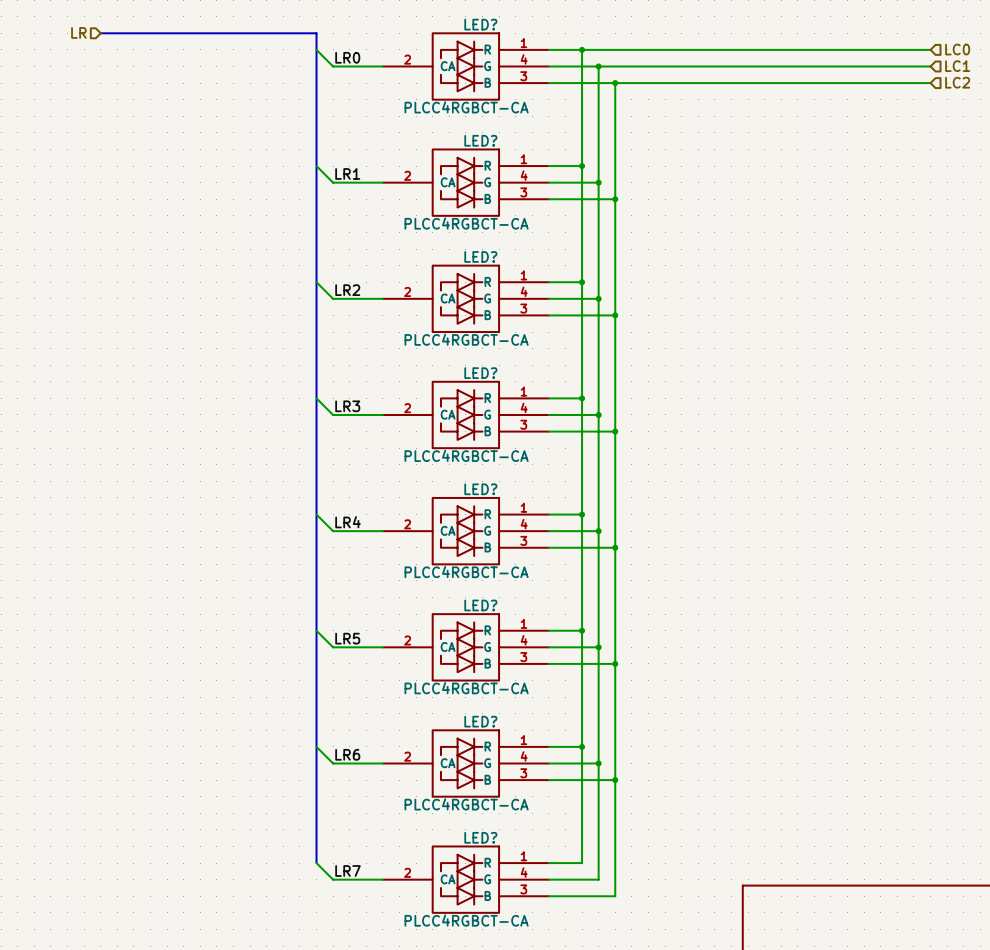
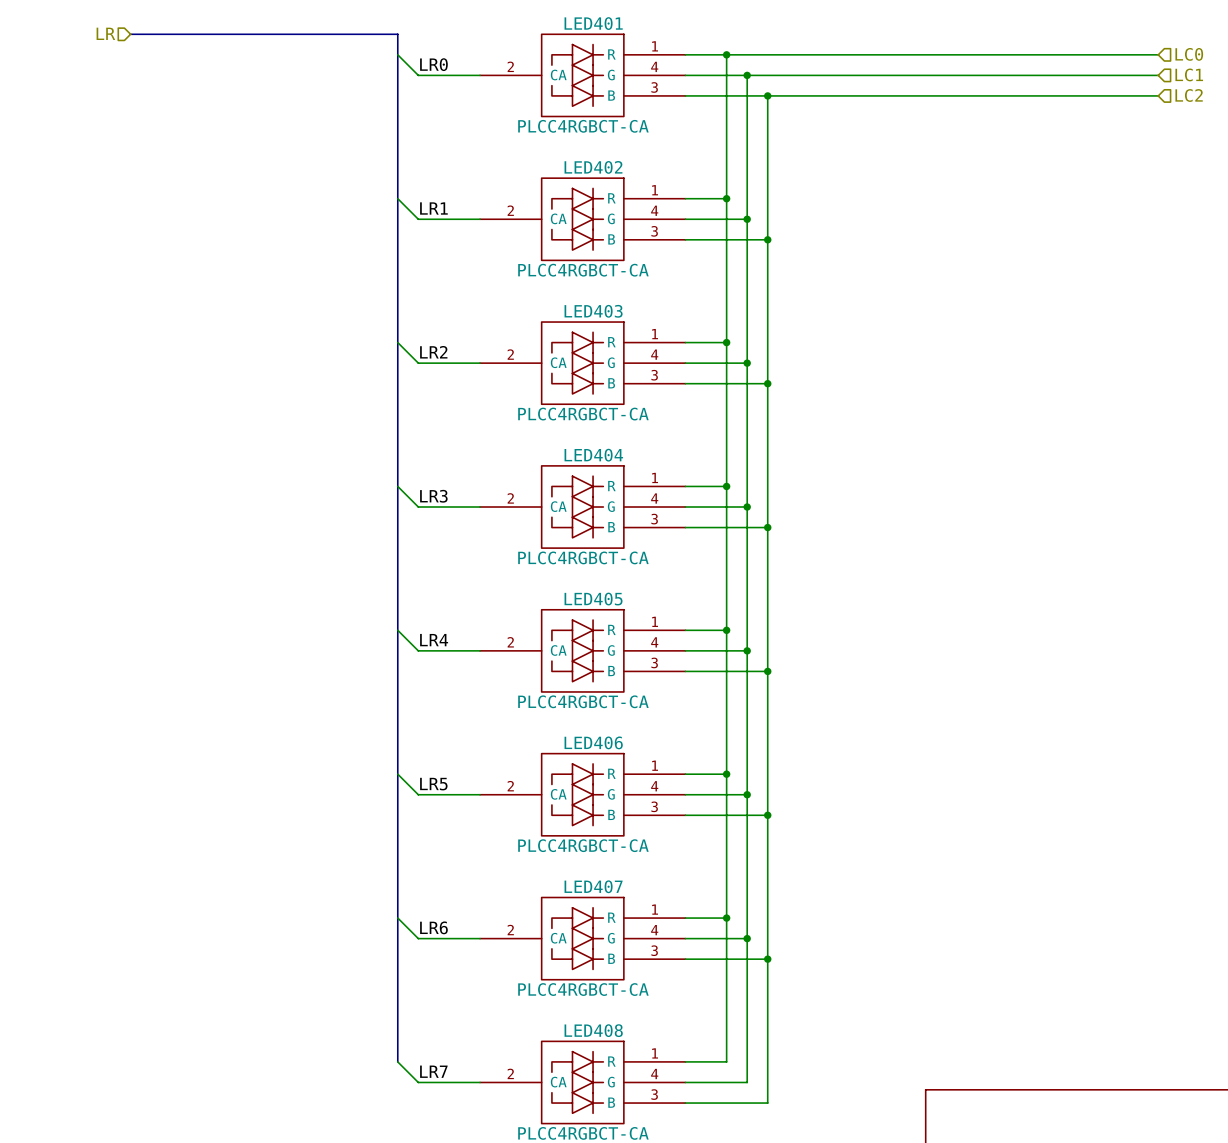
LED? name: LED? (480, 24) -> LED401 (593, 23)
LED? name: LED? (480, 140) -> LED402 (593, 167)
LED? name: LED? (480, 256) -> LED403 (593, 311)
LED? name: LED? (480, 373) -> LED404 (593, 455)
LED? name: LED? (480, 489) -> LED405 (593, 599)
LED? name: LED? (480, 605) -> LED406 (593, 742)
LED? name: LED? (480, 721) -> LED407 (593, 886)
LED? name: LED? (480, 837) -> LED408 (593, 1030)

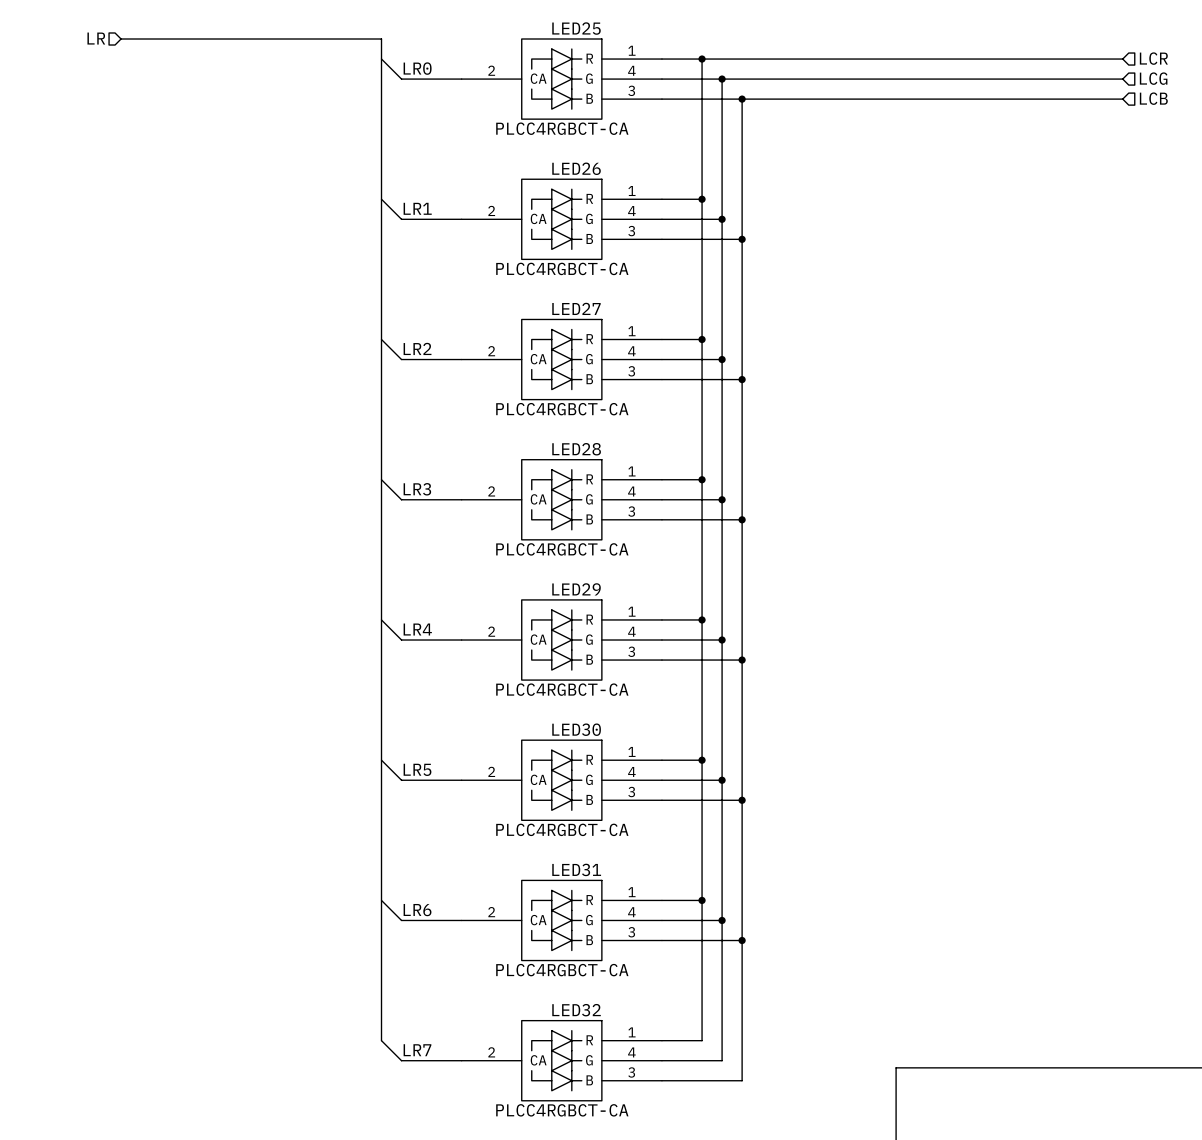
LED401 name: LED401 (593, 23) -> LED25 (576, 28)
hierarchical label: LC0 (1189, 54) -> LCR (1153, 58)
hierarchical label: LC1 (1189, 74) -> LCG (1153, 78)
hierarchical label: LC2 (1189, 95) -> LCB (1153, 98)
LED402 name: LED402 (593, 167) -> LED26 (576, 168)
LED403 name: LED403 (593, 311) -> LED27 (576, 308)
LED404 name: LED404 (593, 455) -> LED28 (576, 449)
LED405 name: LED405 (593, 599) -> LED29 (576, 589)
LED406 name: LED406 (593, 742) -> LED30 (576, 729)
LED407 name: LED407 (593, 886) -> LED31 (576, 869)
LED408 name: LED408 (593, 1030) -> LED32 (576, 1010)

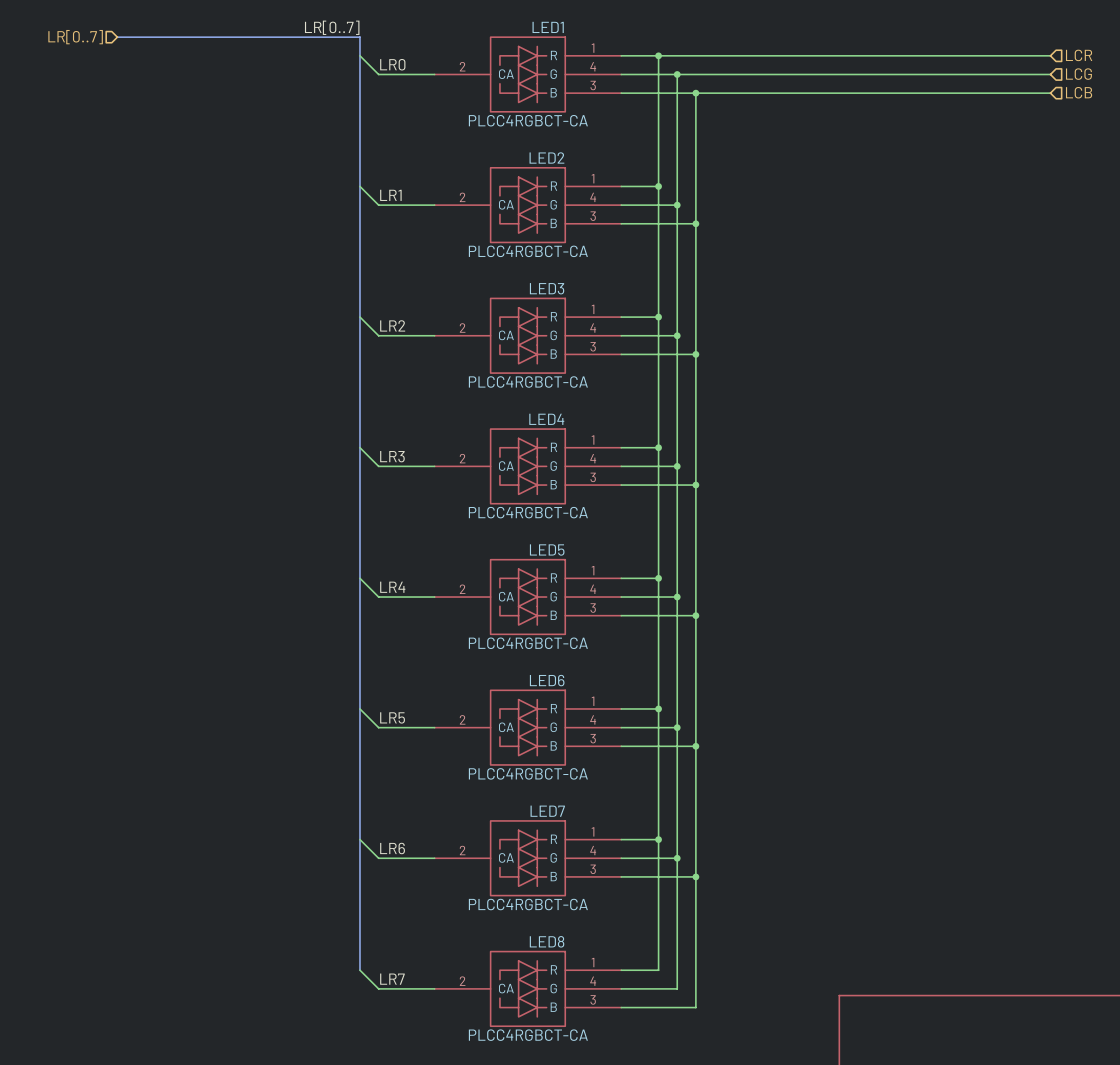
LED25 name: LED25 (576, 28) -> LED1 (548, 27)
label: none -> LR[0..7] (332, 27)
hierarchical label: LR (96, 38) -> LR[0..7] (75, 37)
LED26 name: LED26 (576, 168) -> LED2 (546, 157)
LED27 name: LED27 (576, 308) -> LED3 (547, 288)
LED28 name: LED28 (576, 449) -> LED4 (546, 419)
LED29 name: LED29 (576, 589) -> LED5 (547, 549)
LED30 name: LED30 (576, 729) -> LED6 (547, 680)
LED31 name: LED31 (576, 869) -> LED7 (547, 811)
LED32 name: LED32 (576, 1010) -> LED8 (547, 941)

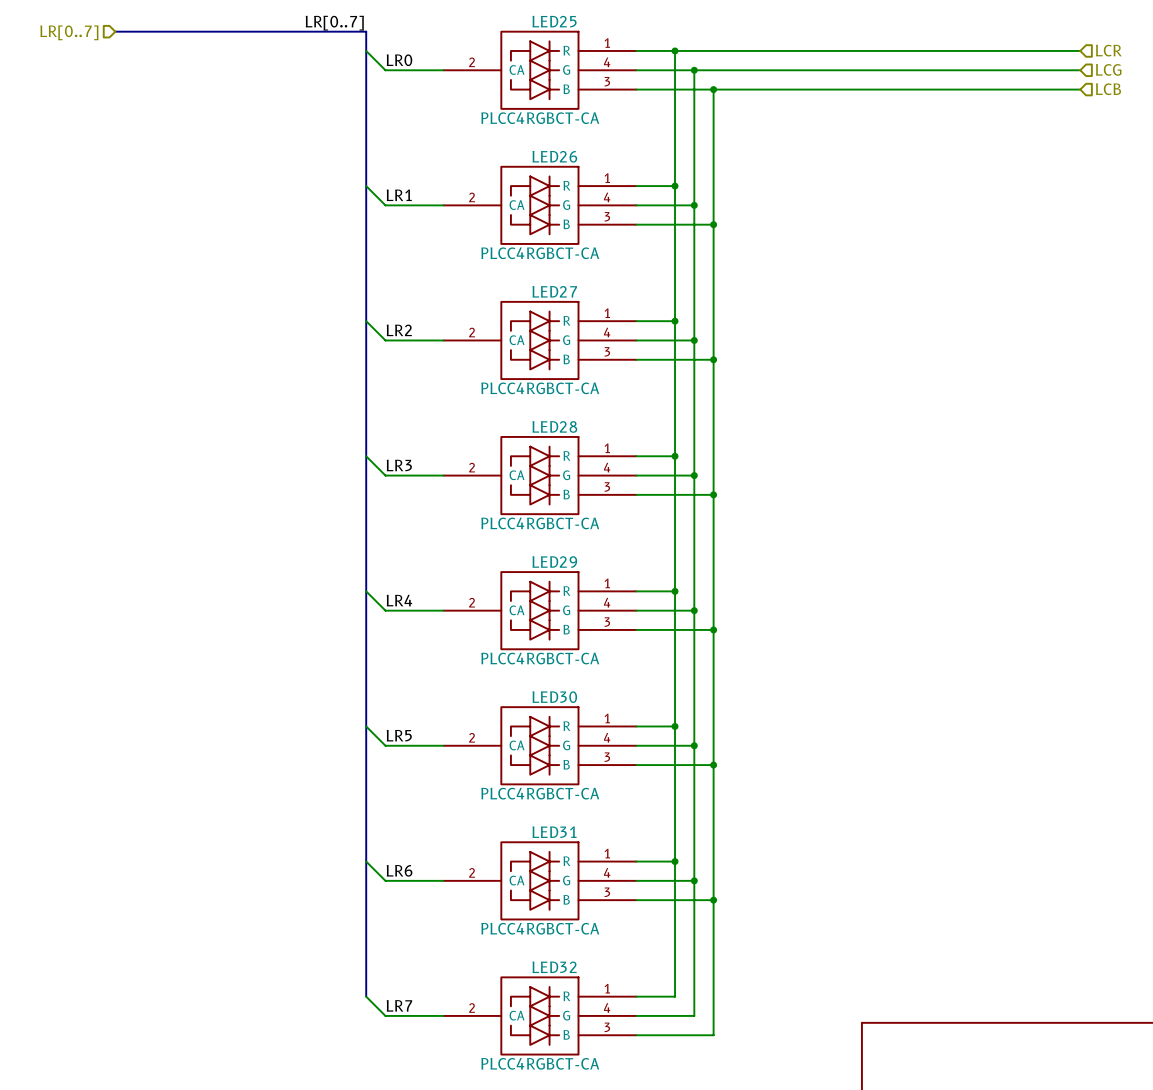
LED1 name: LED1 (548, 27) -> LED25 (554, 21)
LED2 name: LED2 (546, 157) -> LED26 (554, 156)
LED3 name: LED3 (547, 288) -> LED27 (554, 291)
LED4 name: LED4 (546, 419) -> LED28 (554, 426)
LED5 name: LED5 (547, 549) -> LED29 (554, 562)
LED6 name: LED6 (547, 680) -> LED30 (554, 697)
LED7 name: LED7 (547, 811) -> LED31 (554, 832)
LED8 name: LED8 (547, 941) -> LED32 (554, 967)

